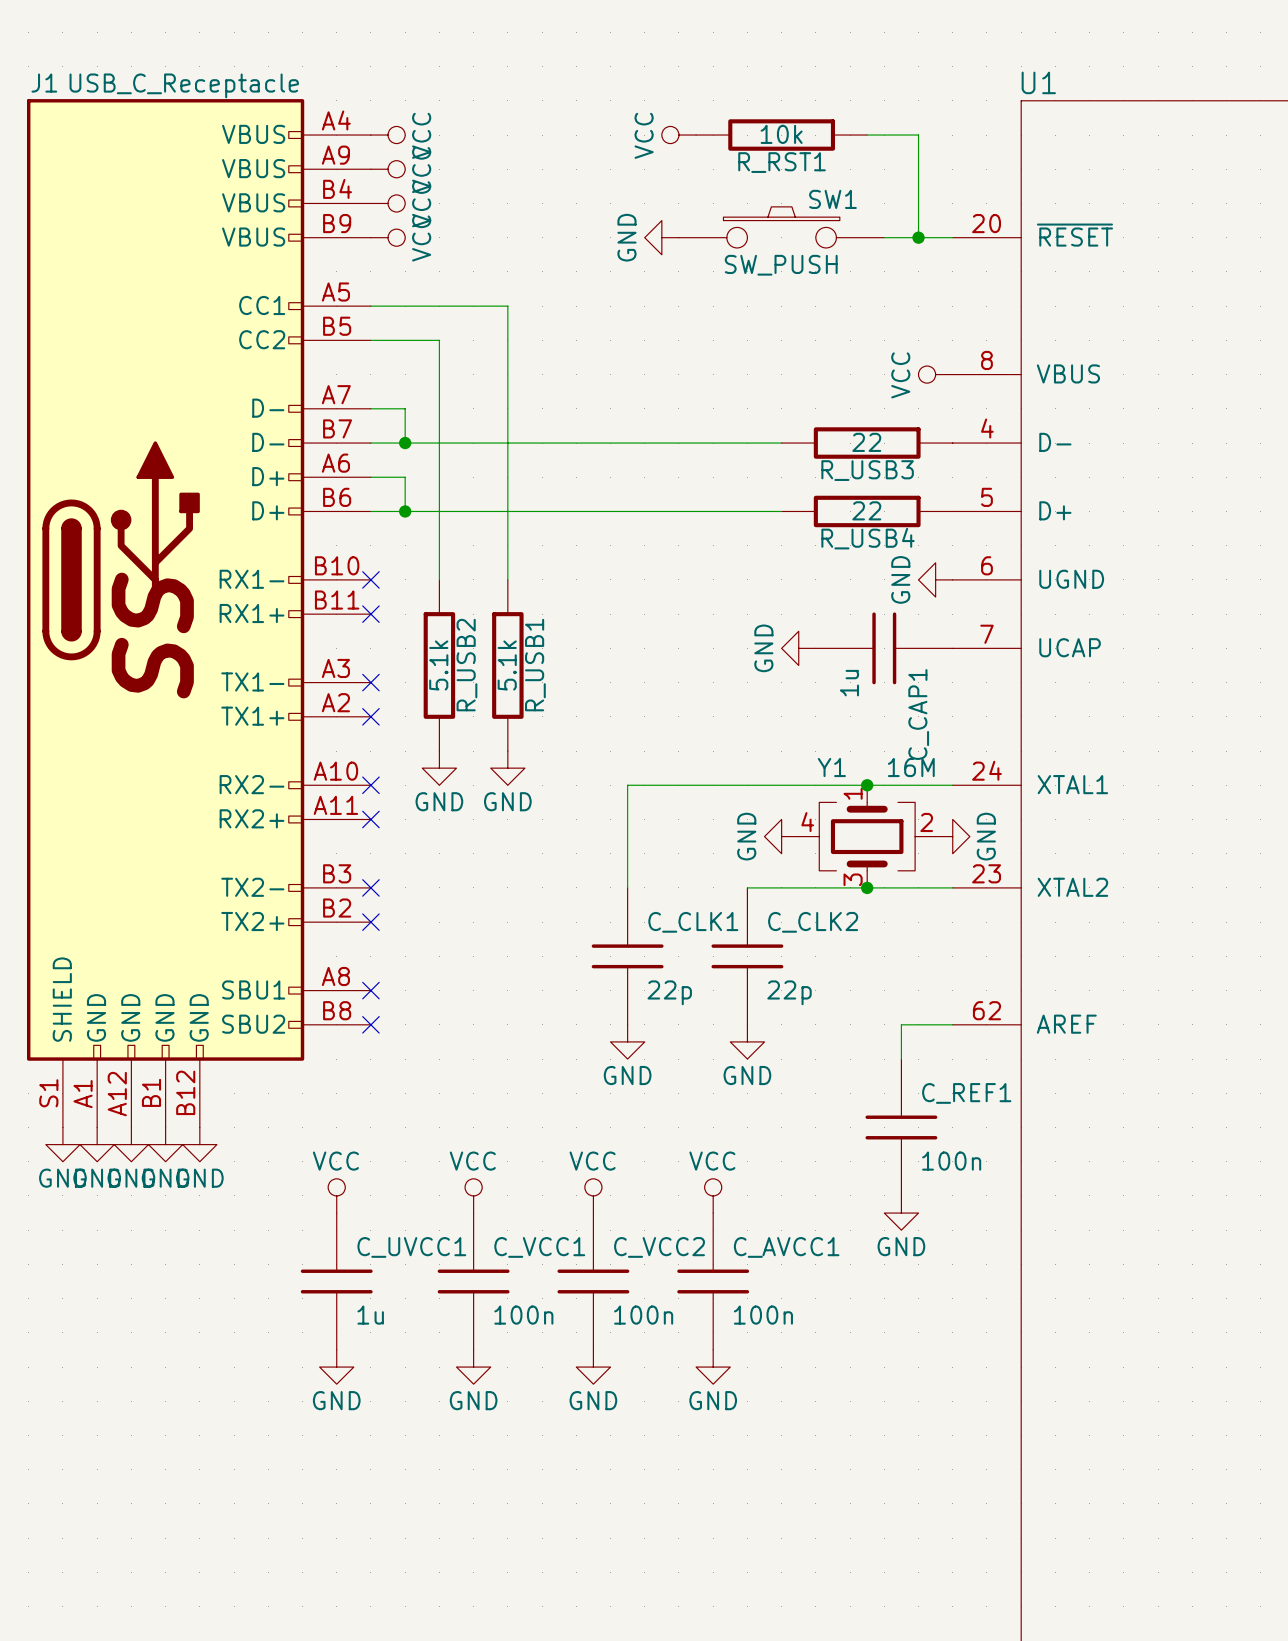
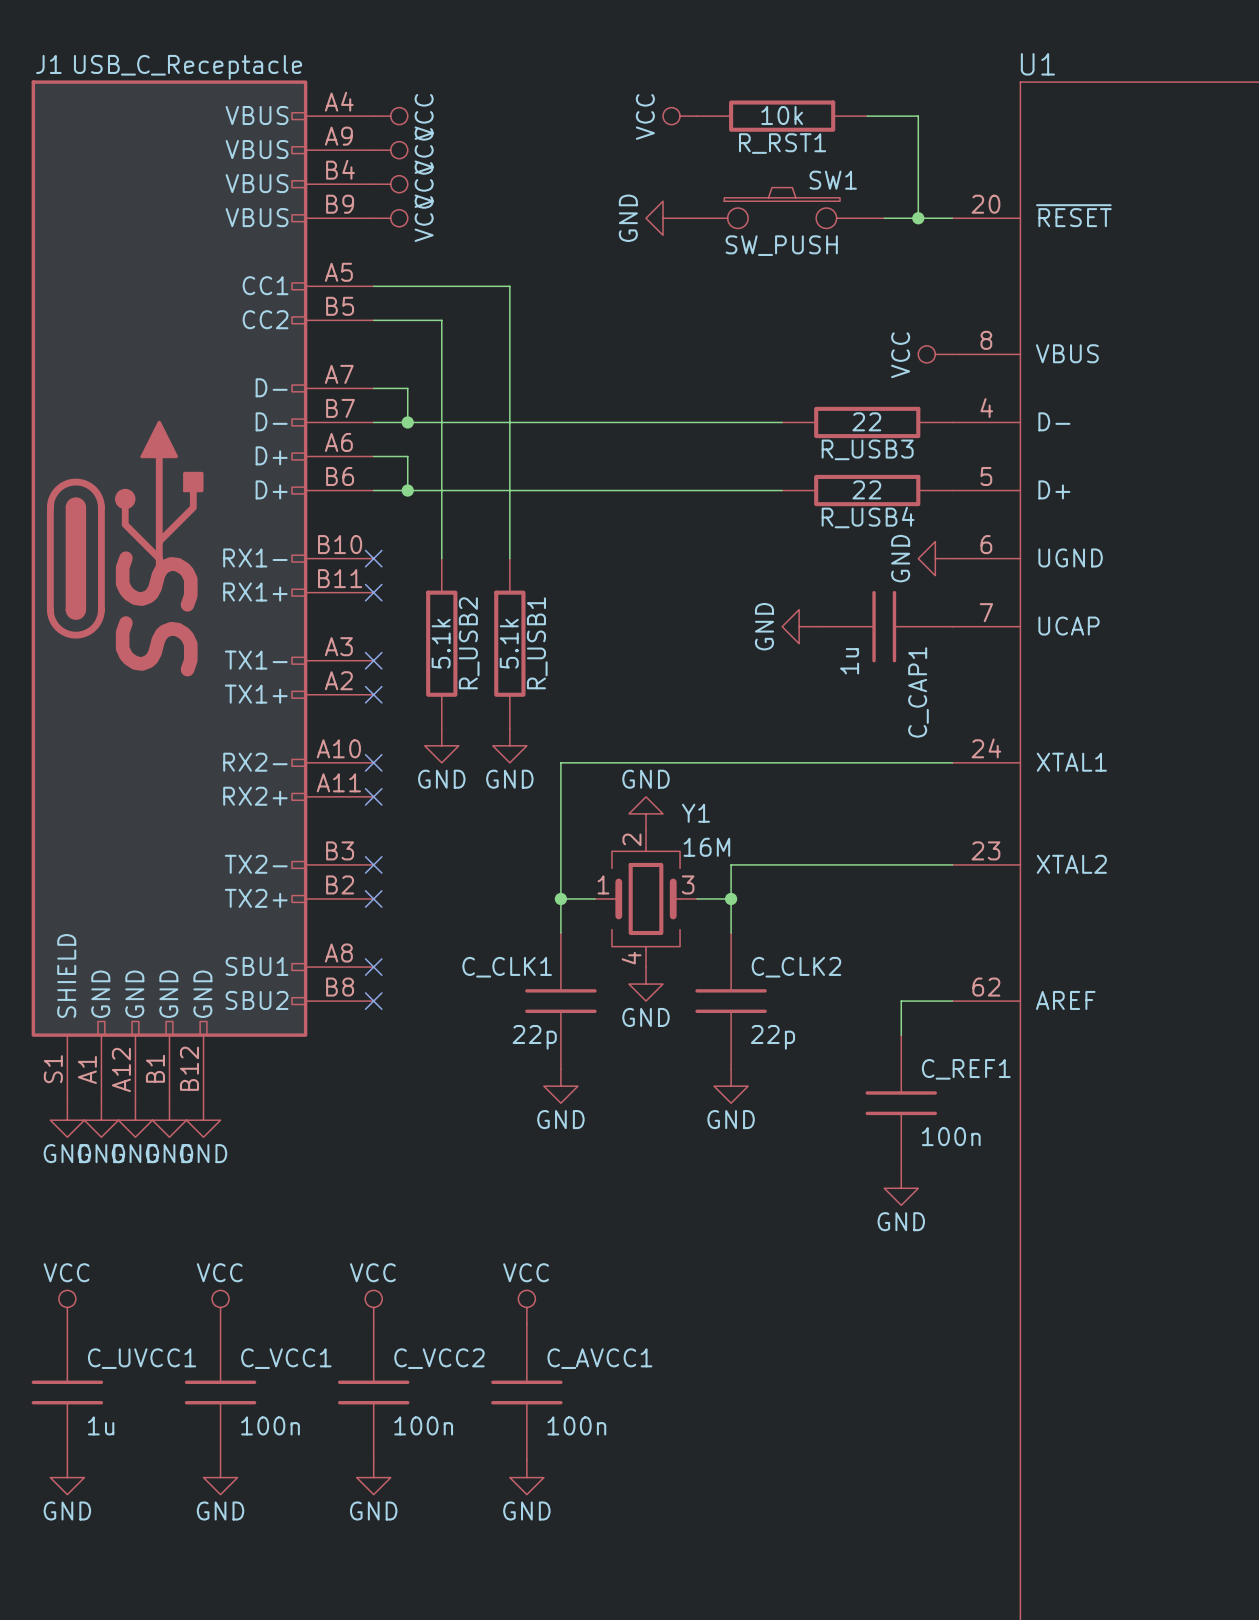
Y1 name position: Y1 (831, 767) -> Y1 (695, 813)
wire: (627, 785) (627, 887) -> (628, 762) (560, 762) (560, 933)
junction: (867, 785) -> none
power symbol: none -> GND (646, 813)
power symbol: GND (781, 836) -> none
Y1 rotation: 0° (867, 836) -> 90° counterclockwise (646, 898)
Y1 position: (867, 836) -> (646, 898)
power symbol: GND (952, 836) -> none
wire: none -> (748, 864) (731, 864) (731, 933)
junction: (867, 887) -> none
wire: none -> (560, 898) (594, 898)
junction: none -> (560, 898)
C_CLK1 name position: C_CLK1 (693, 922) -> C_CLK1 (507, 967)
wire: none -> (697, 898) (731, 898)
junction: none -> (731, 898)
C_CLK1 position: (627, 956) -> (560, 1001)
C_CLK2 position: (747, 956) -> (731, 1001)
C_CLK1 value position: 22p (669, 992) -> 22p (534, 1037)
power symbol position: GND (627, 1041) -> GND (646, 984)
power symbol: GND (747, 1041) -> none
power symbol: none -> GND (560, 1086)
power symbol: none -> GND (731, 1086)
power symbol: VCC (336, 1195) -> none
power symbol: VCC (473, 1195) -> none
power symbol: VCC (593, 1195) -> none
power symbol: VCC (713, 1195) -> none
C_UVCC1 position: (336, 1281) -> (67, 1392)
C_VCC1 position: (473, 1281) -> (220, 1392)
C_VCC2 position: (593, 1281) -> (373, 1392)
C_AVCC1 position: (713, 1281) -> (526, 1392)
power symbol: none -> VCC (67, 1307)
power symbol: none -> VCC (220, 1307)
power symbol: none -> VCC (373, 1307)
power symbol: none -> VCC (526, 1307)
power symbol: GND (336, 1367) -> none
power symbol: GND (473, 1367) -> none
power symbol: GND (593, 1367) -> none
power symbol: GND (713, 1367) -> none
power symbol: none -> GND (67, 1477)
power symbol: none -> GND (220, 1477)
power symbol: none -> GND (373, 1477)
power symbol: none -> GND (526, 1477)

